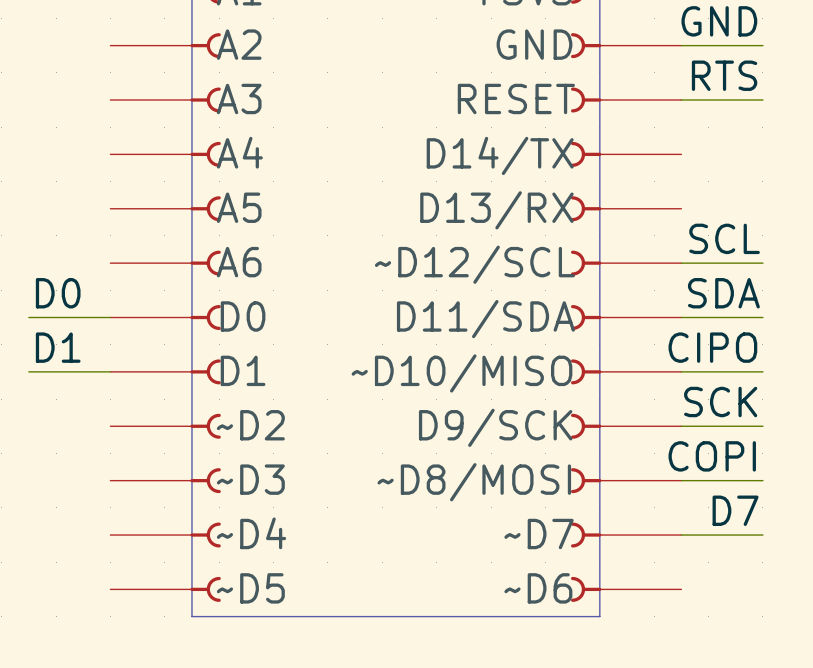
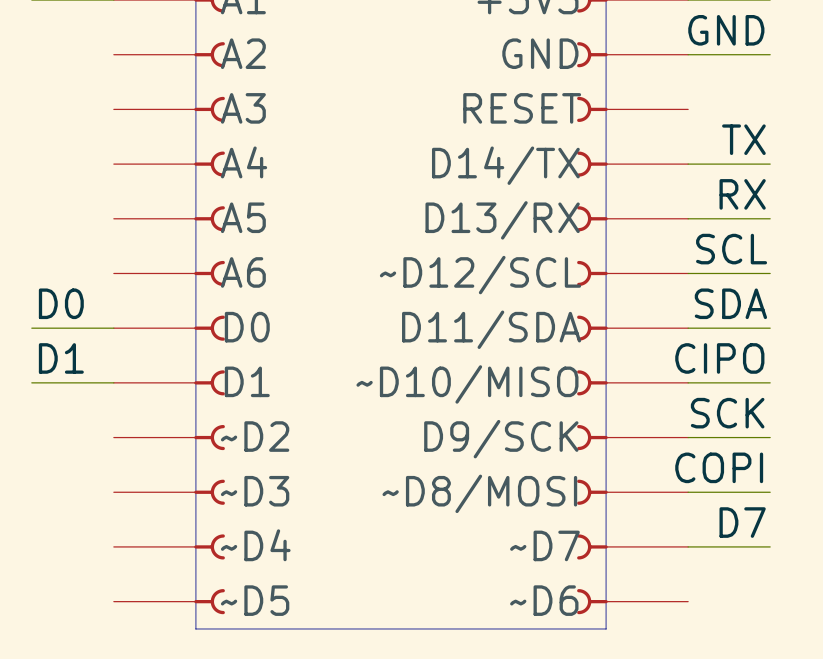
label: RTS (724, 75) -> none
wire: (681, 100) (762, 100) -> (688, 164) (770, 164)
label: none -> TX (743, 139)
label: none -> RX (742, 194)
wire: none -> (688, 218) (770, 218)

